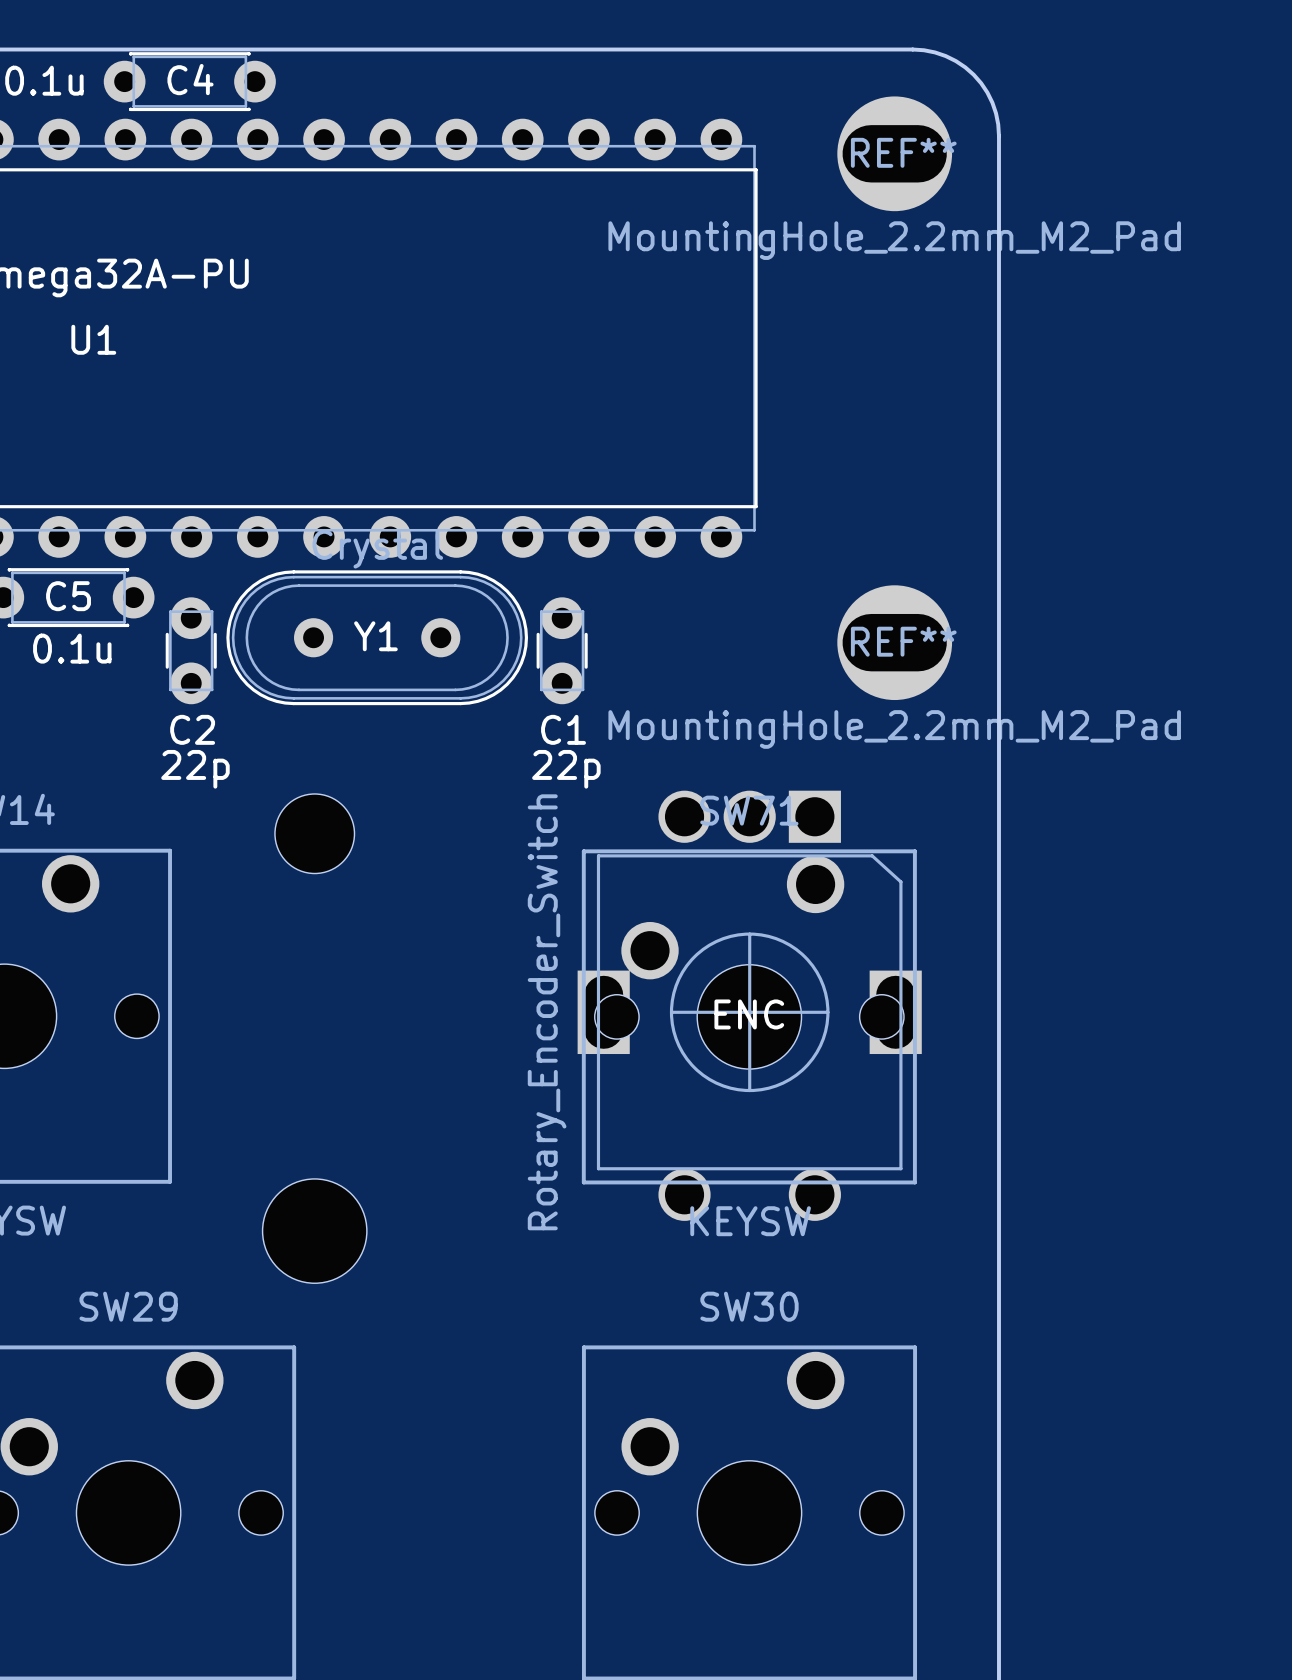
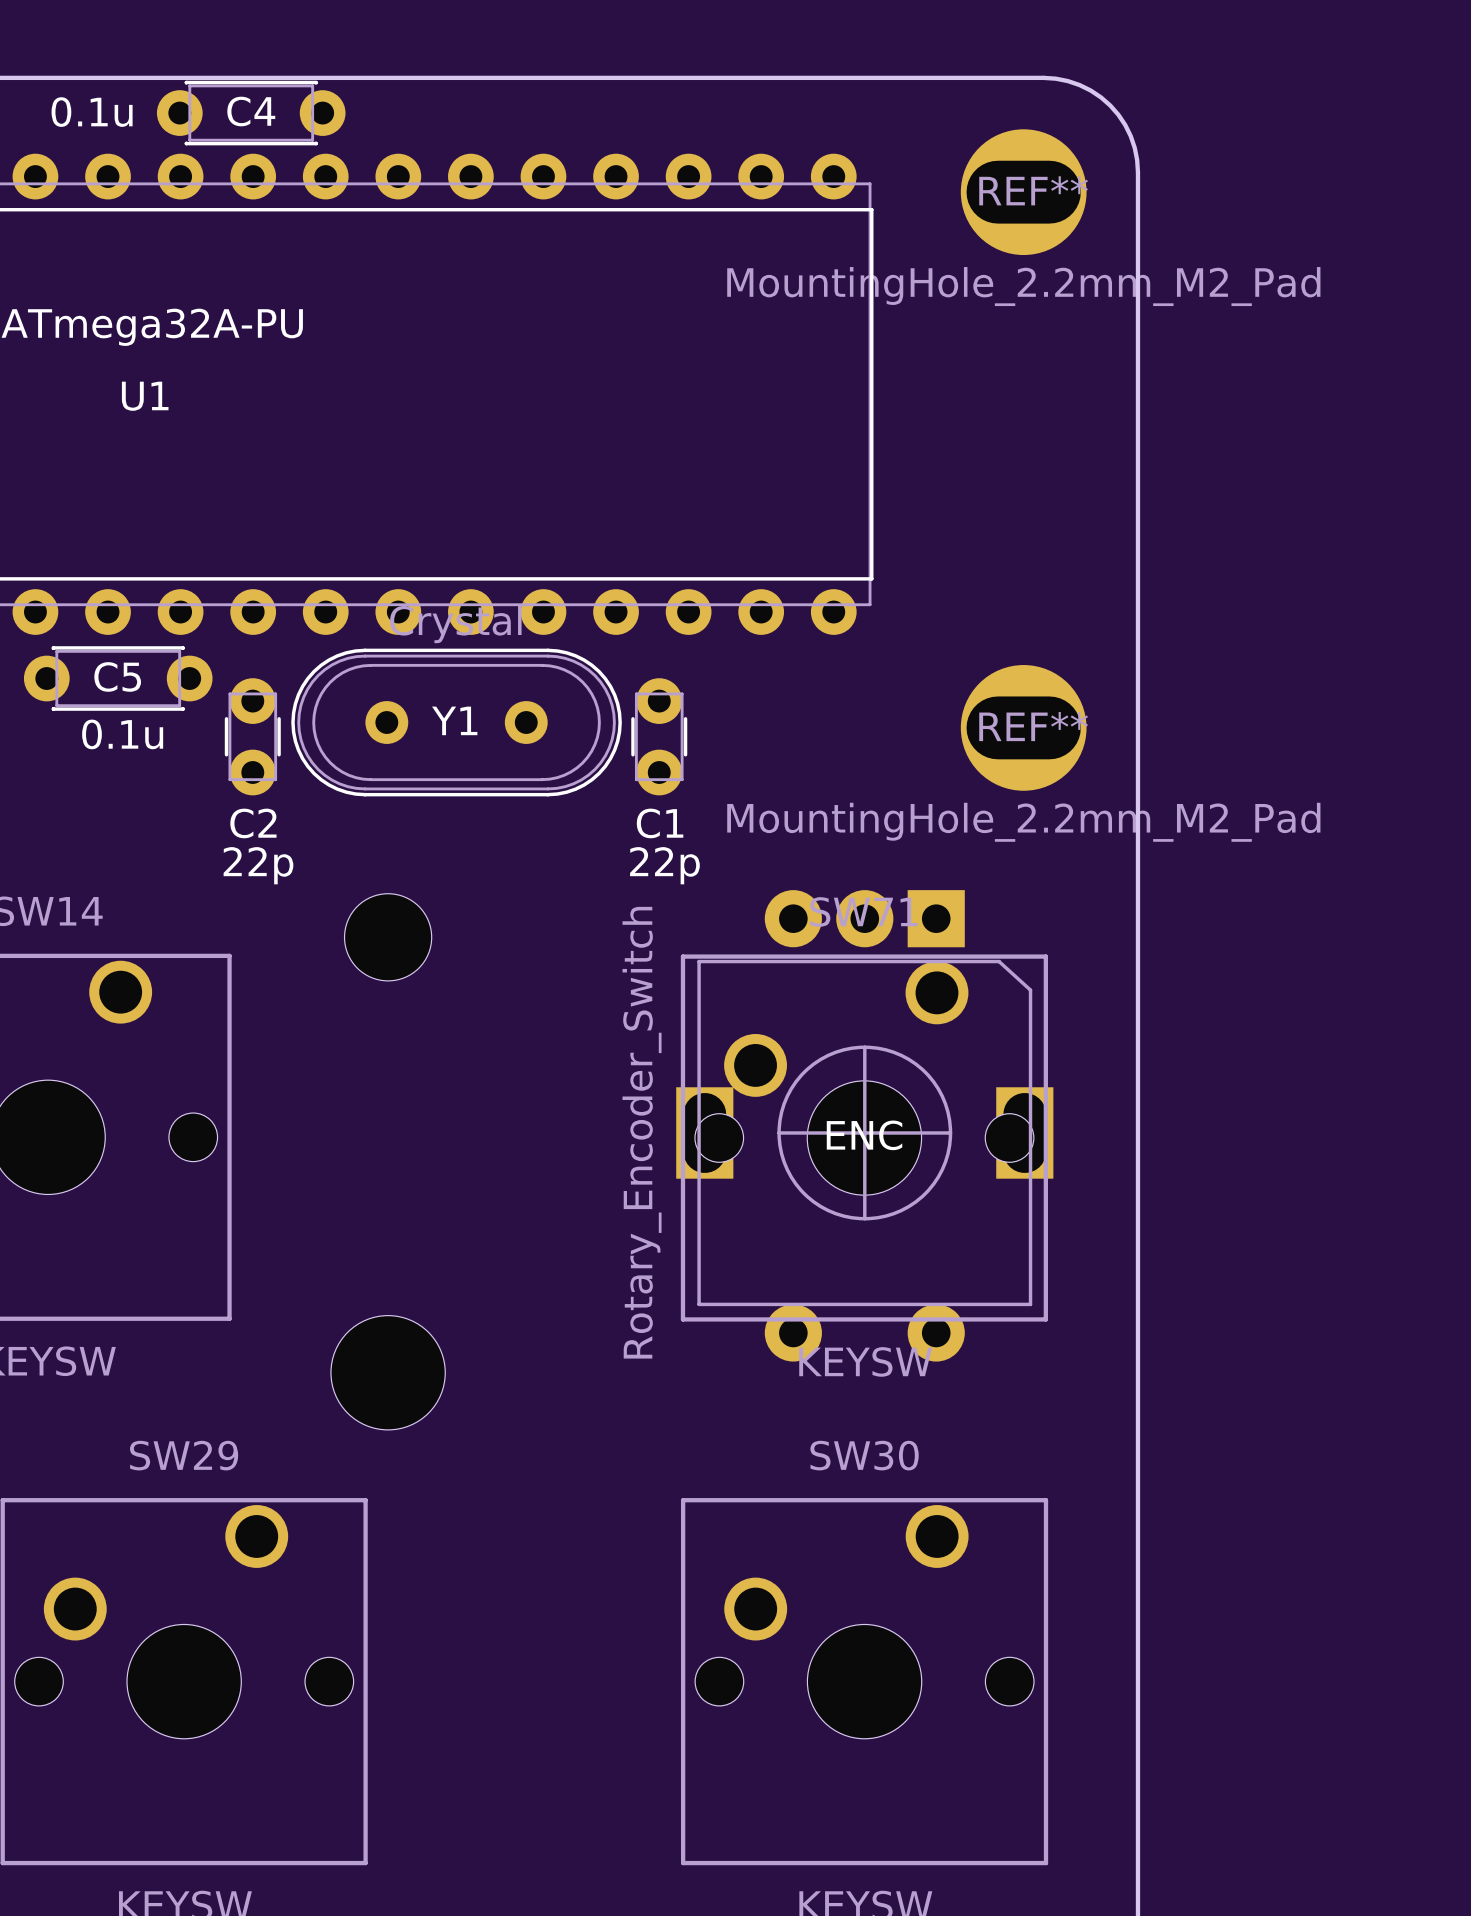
part footprint: [577, 790, 922, 1221] -> [676, 890, 1054, 1362]

